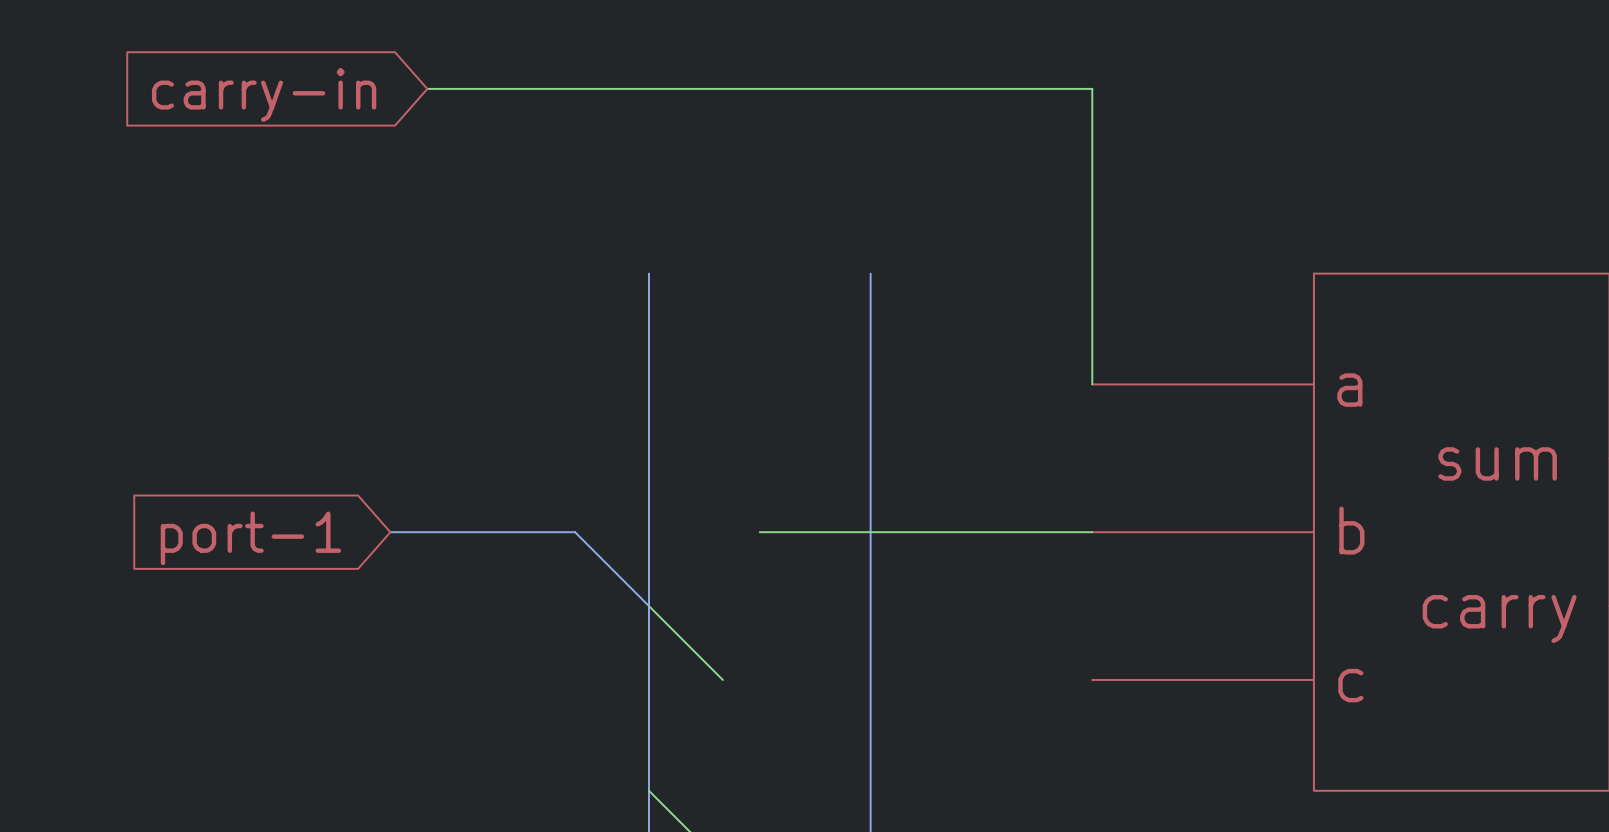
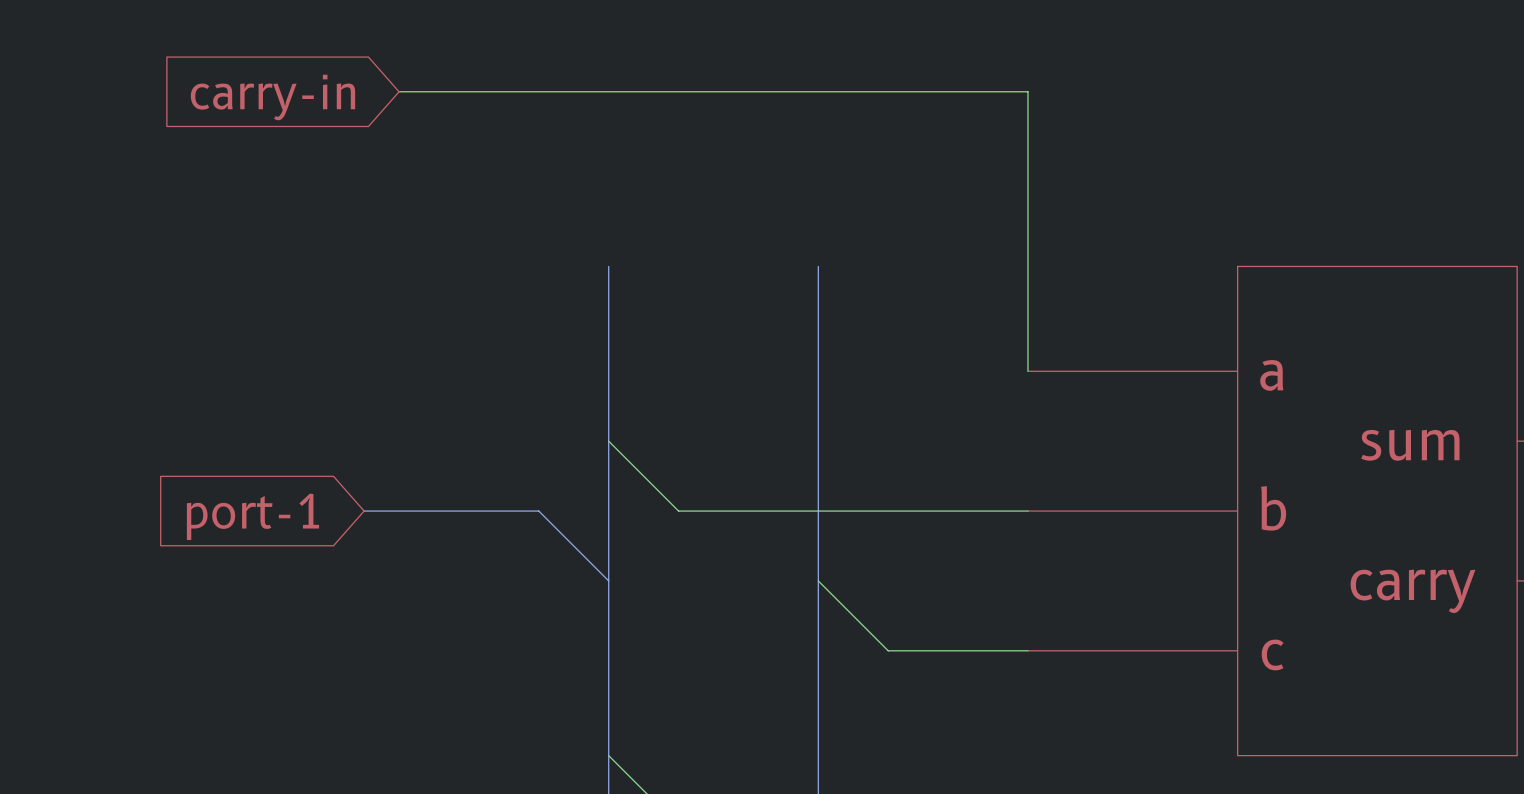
wire: none -> (608, 441) (678, 511) (713, 511)
wire: (648, 606) (722, 679) -> none
wire: none -> (818, 580) (888, 650) (1027, 650)

